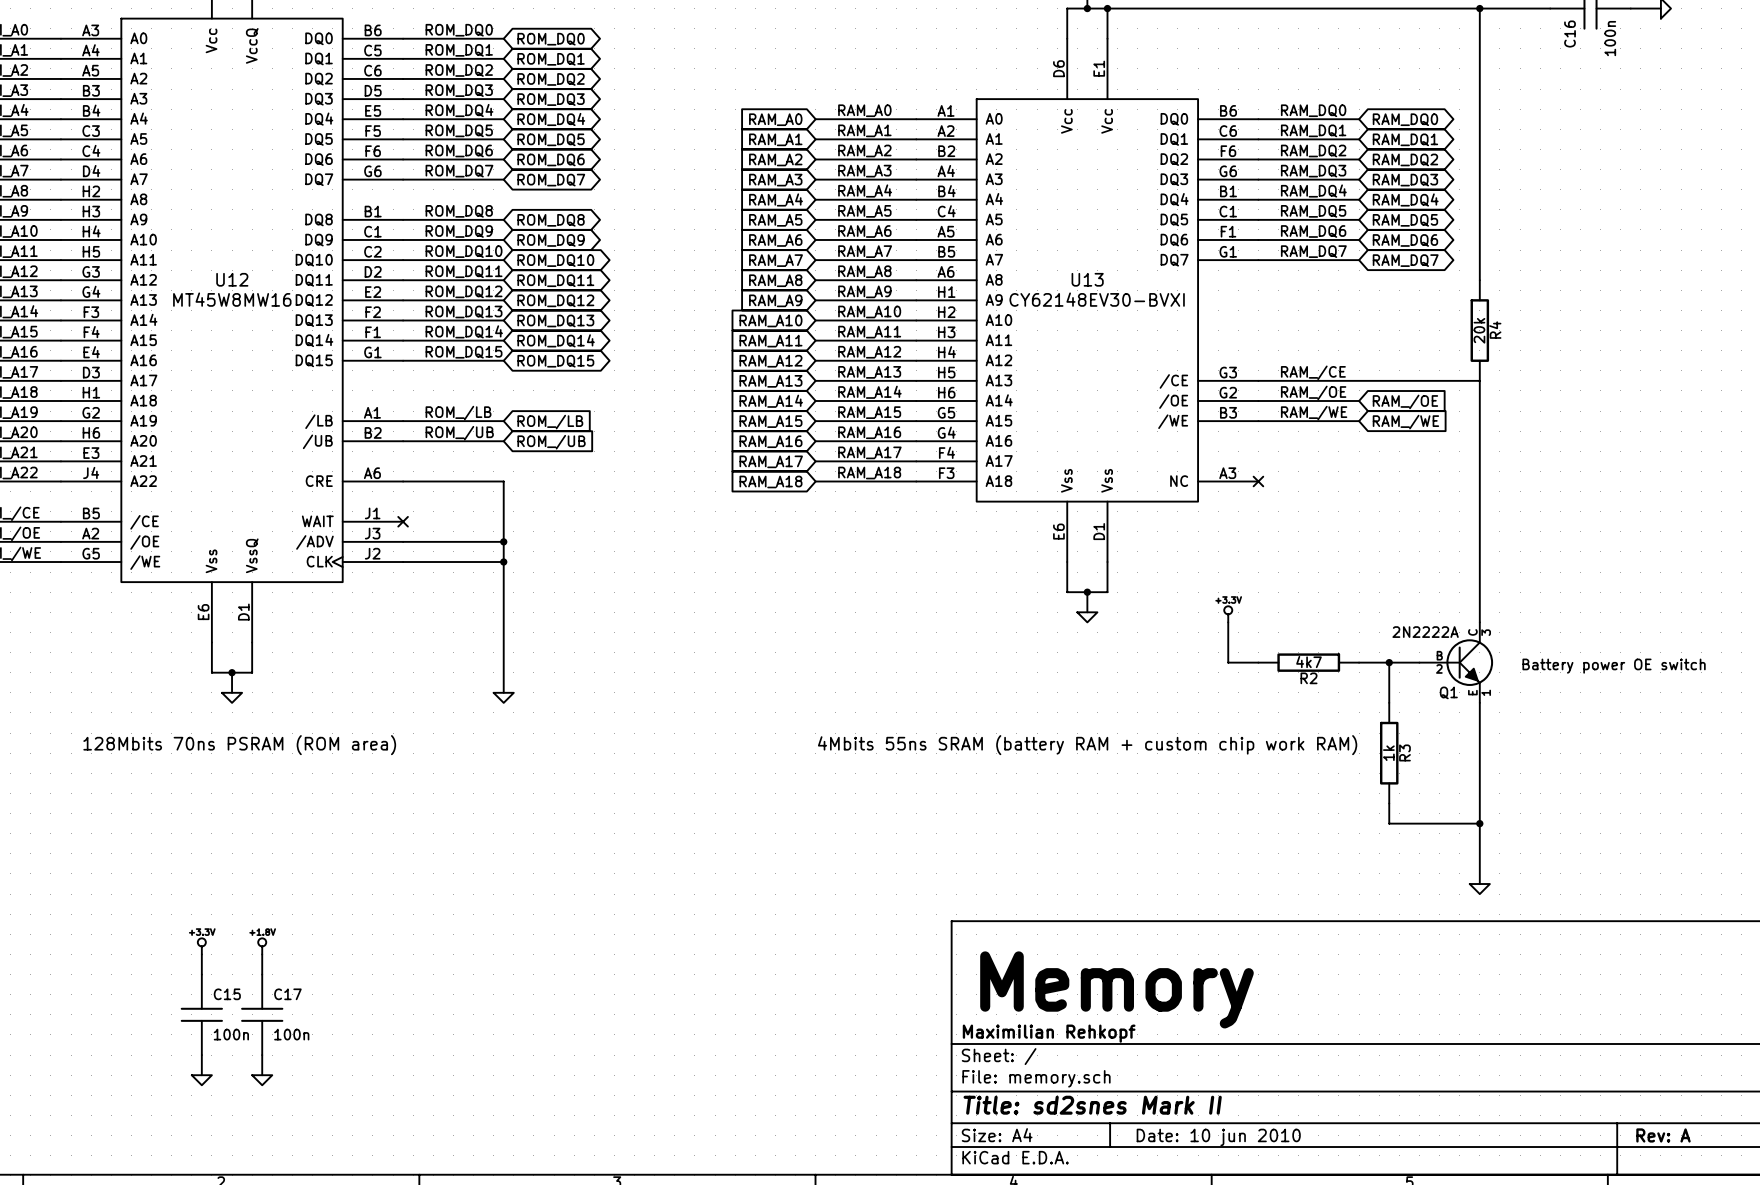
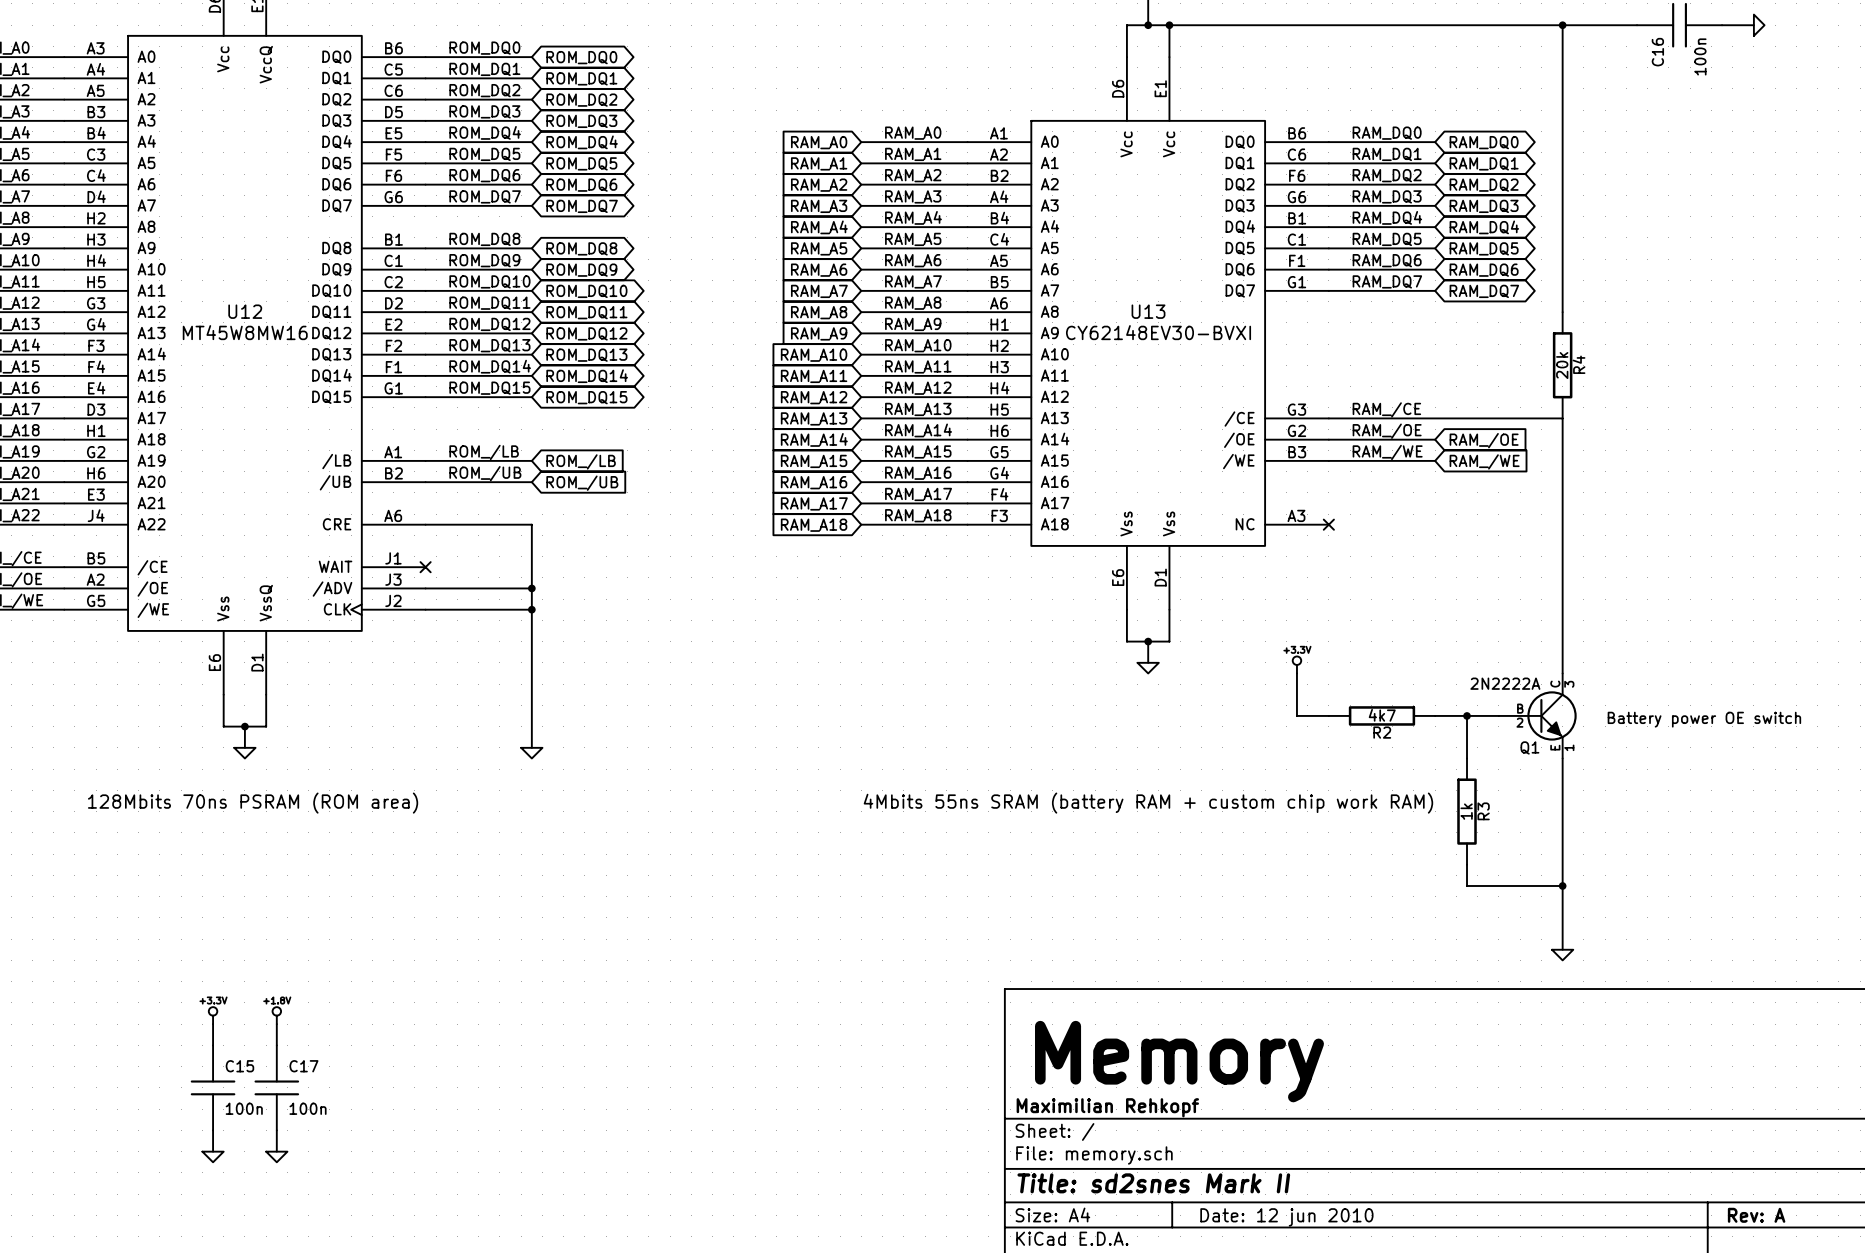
title block: Date: 10 jun 2010 (1218, 1137) -> Date: 12 jun 2010 (1286, 1217)

